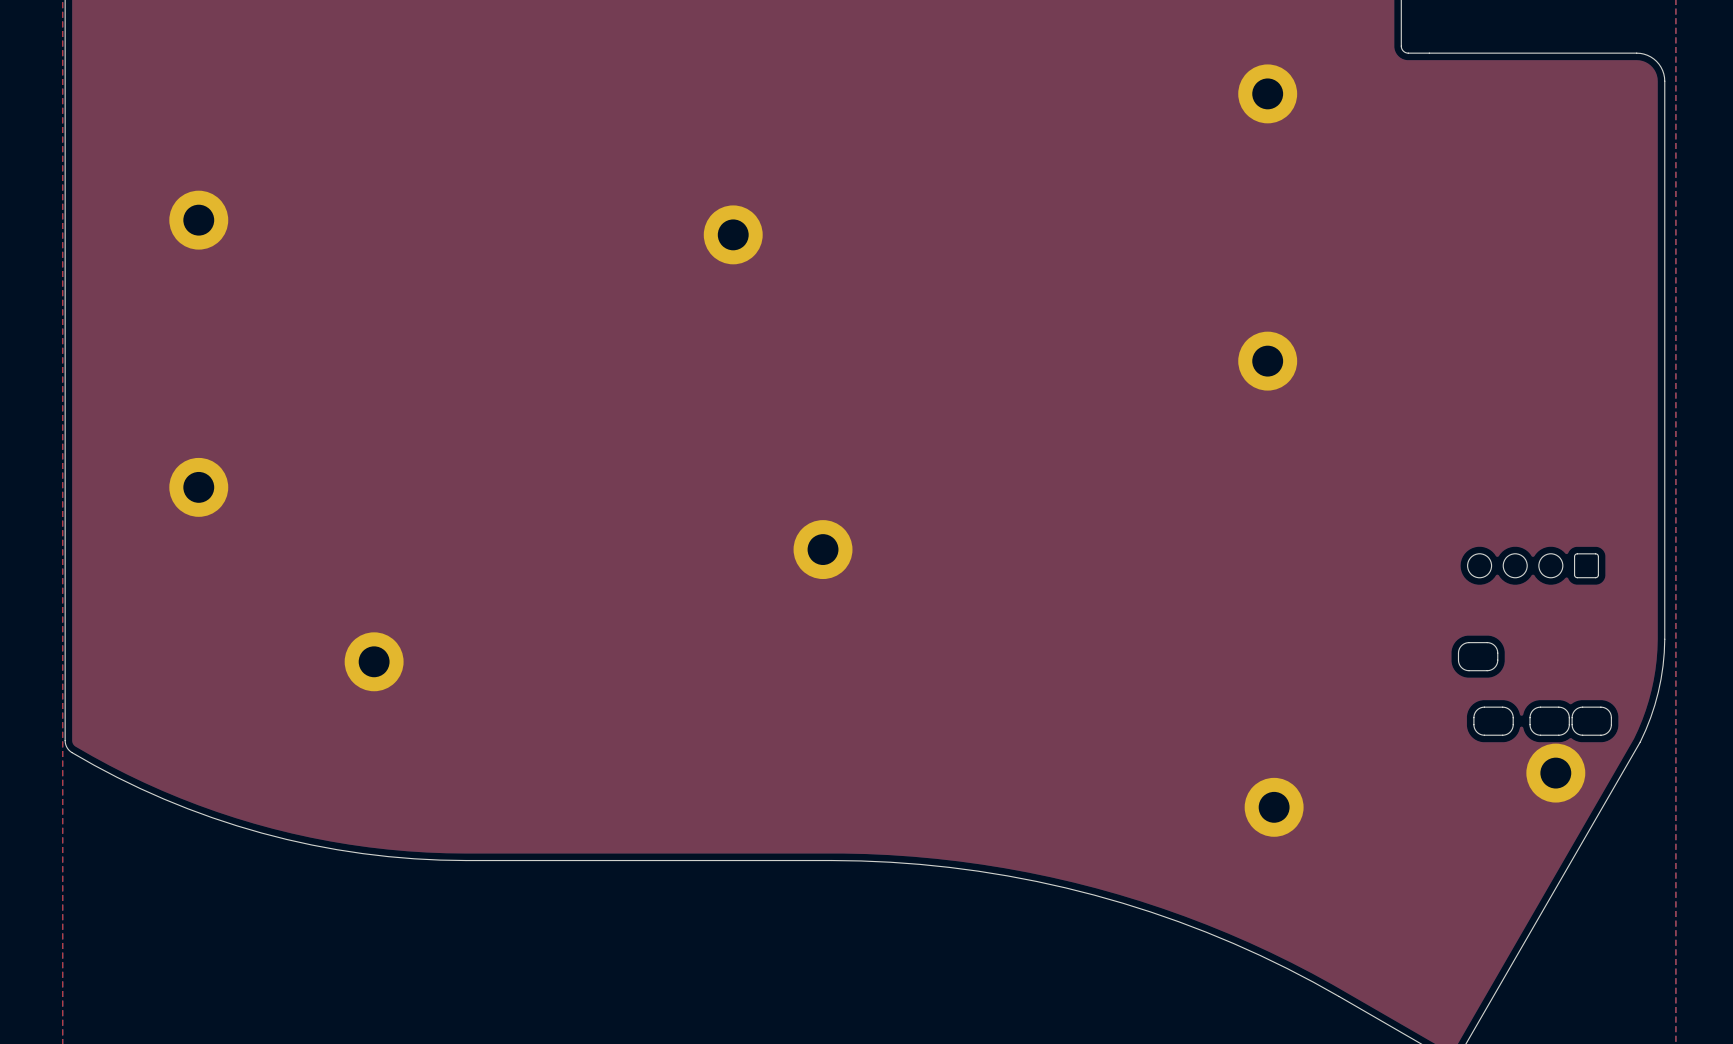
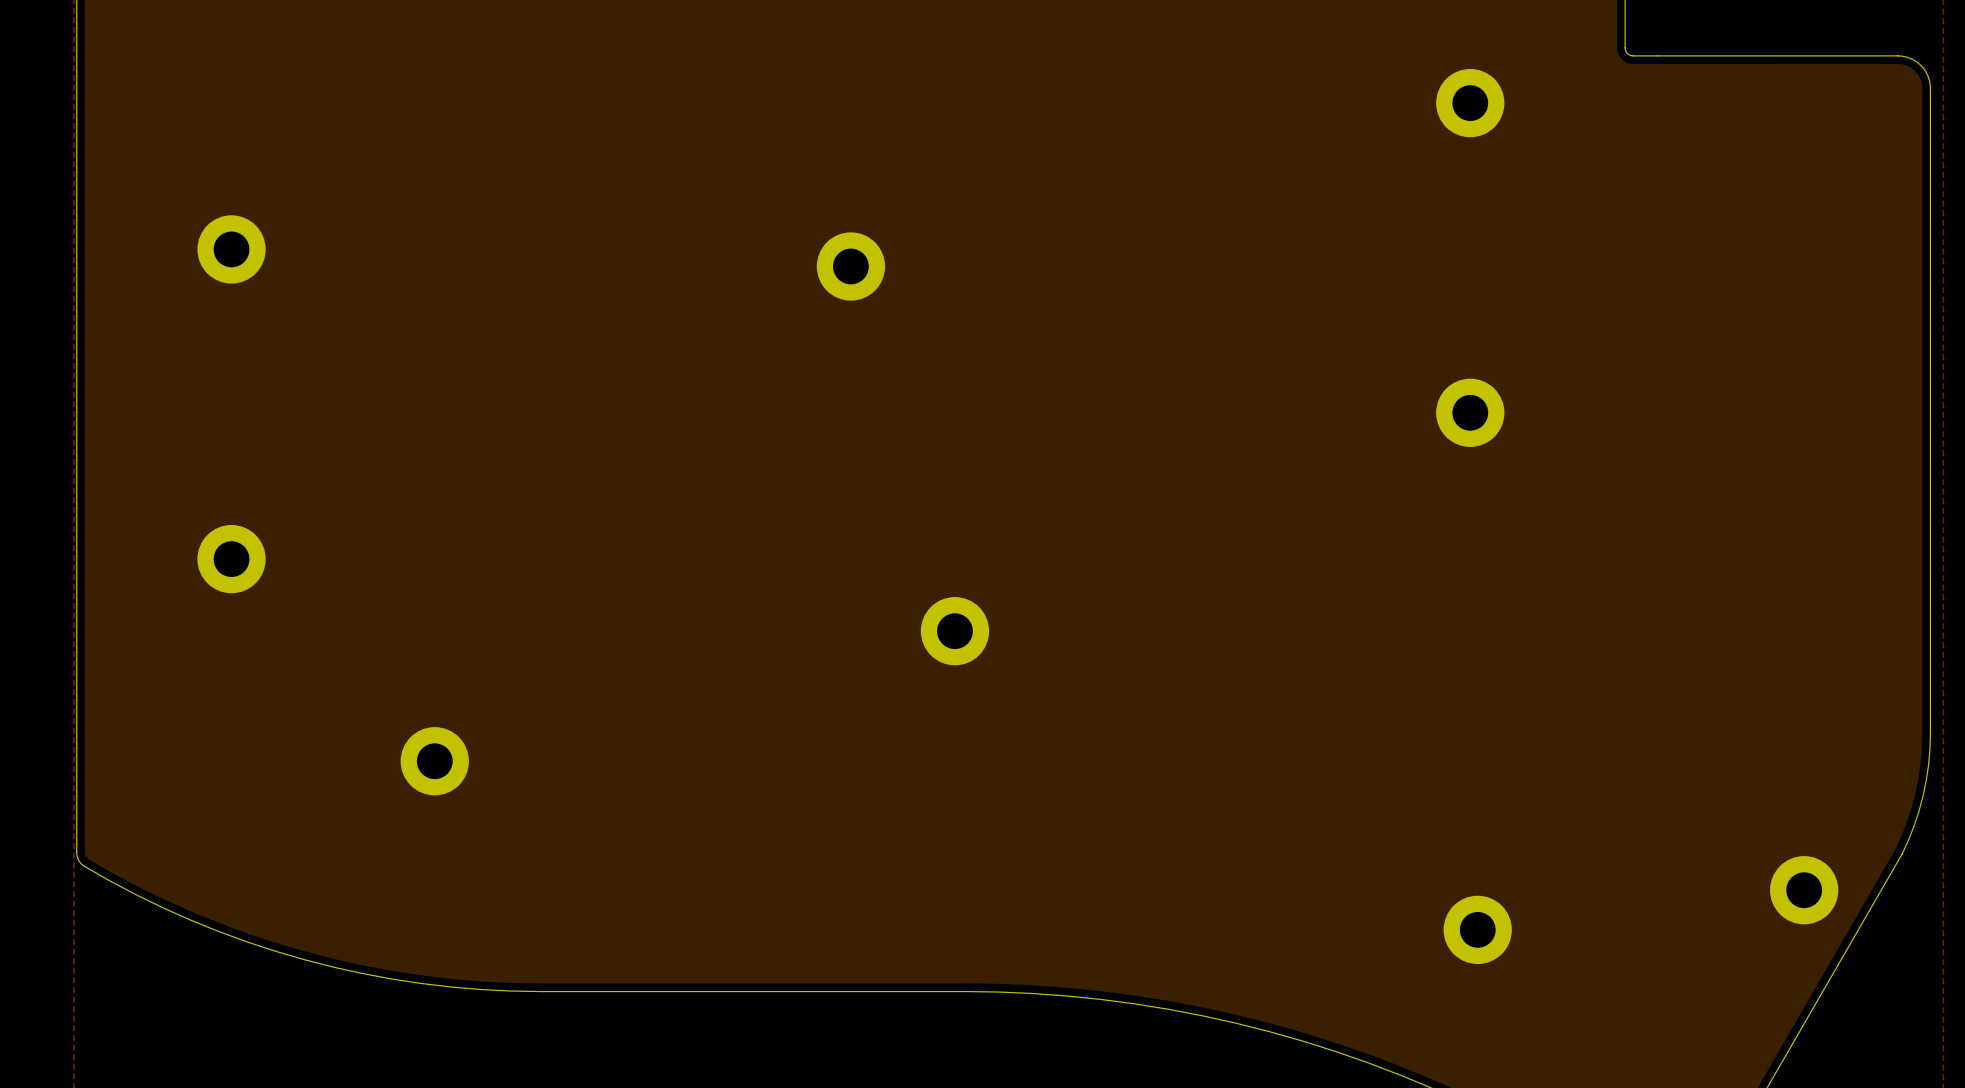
drawing: [1467, 553, 1599, 579] -> none
drawing: [1458, 642, 1612, 736] -> none

